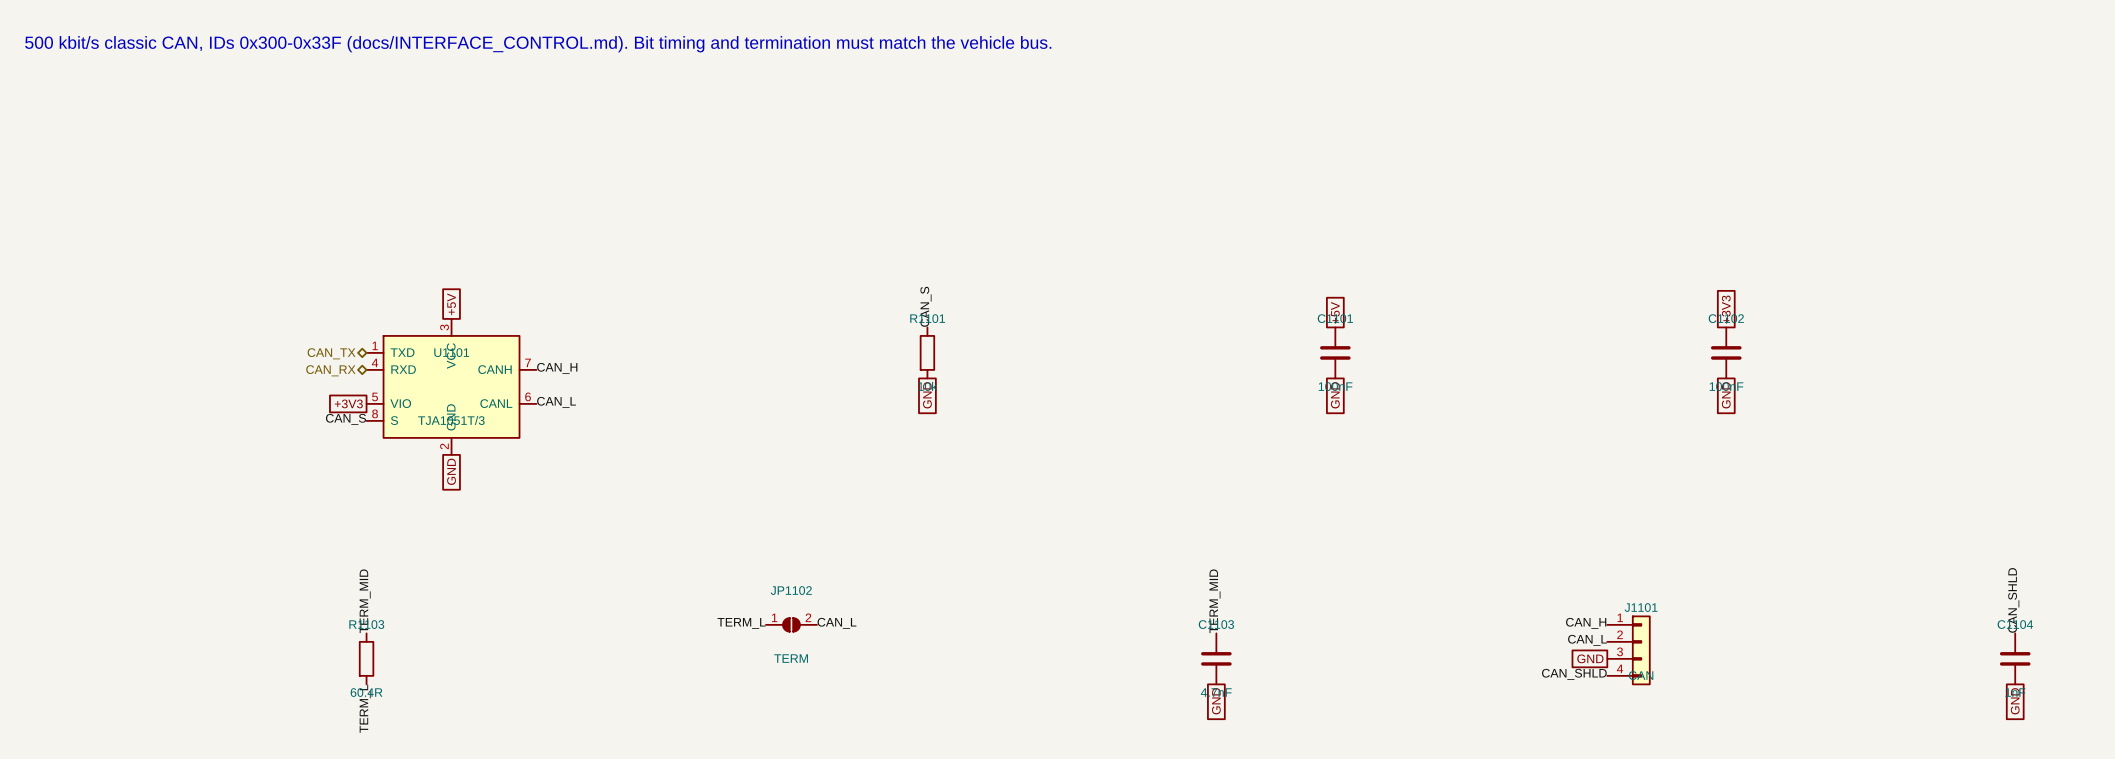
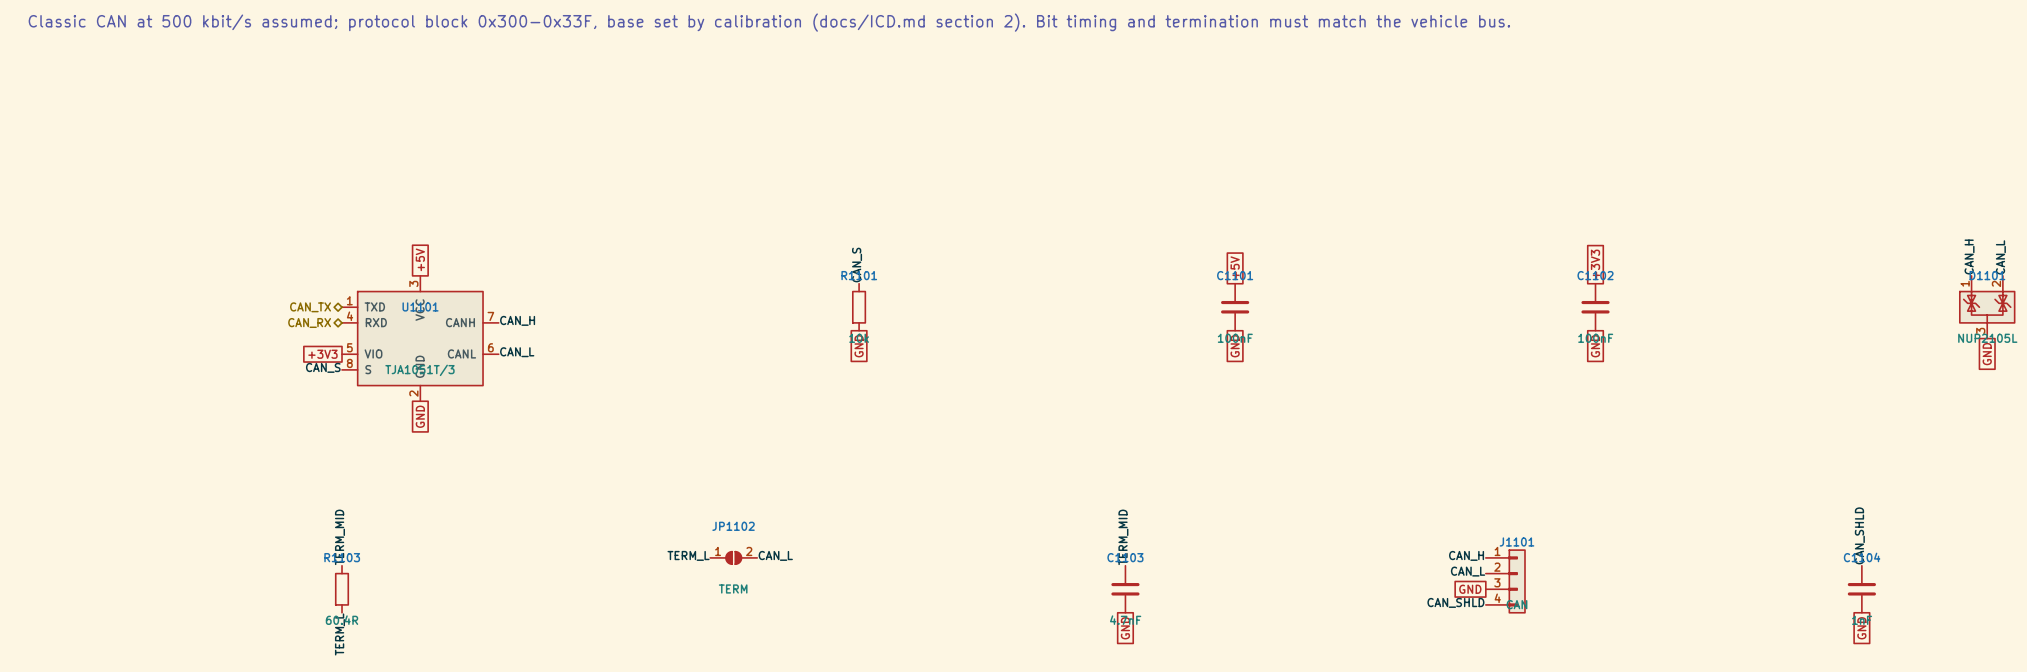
text: 500 kbit/s classic CAN, IDs 0x300-0x33F (docs/INTERFACE_CONTROL.md). Bit timing and termination must match the vehicle bus. (538, 44) -> Classic CAN at 500 kbit/s assumed; protocol block 0x300-0x33F, base set by calibration (docs/ICD.md section 2). Bit timing and termination must match the vehicle bus. (769, 22)

